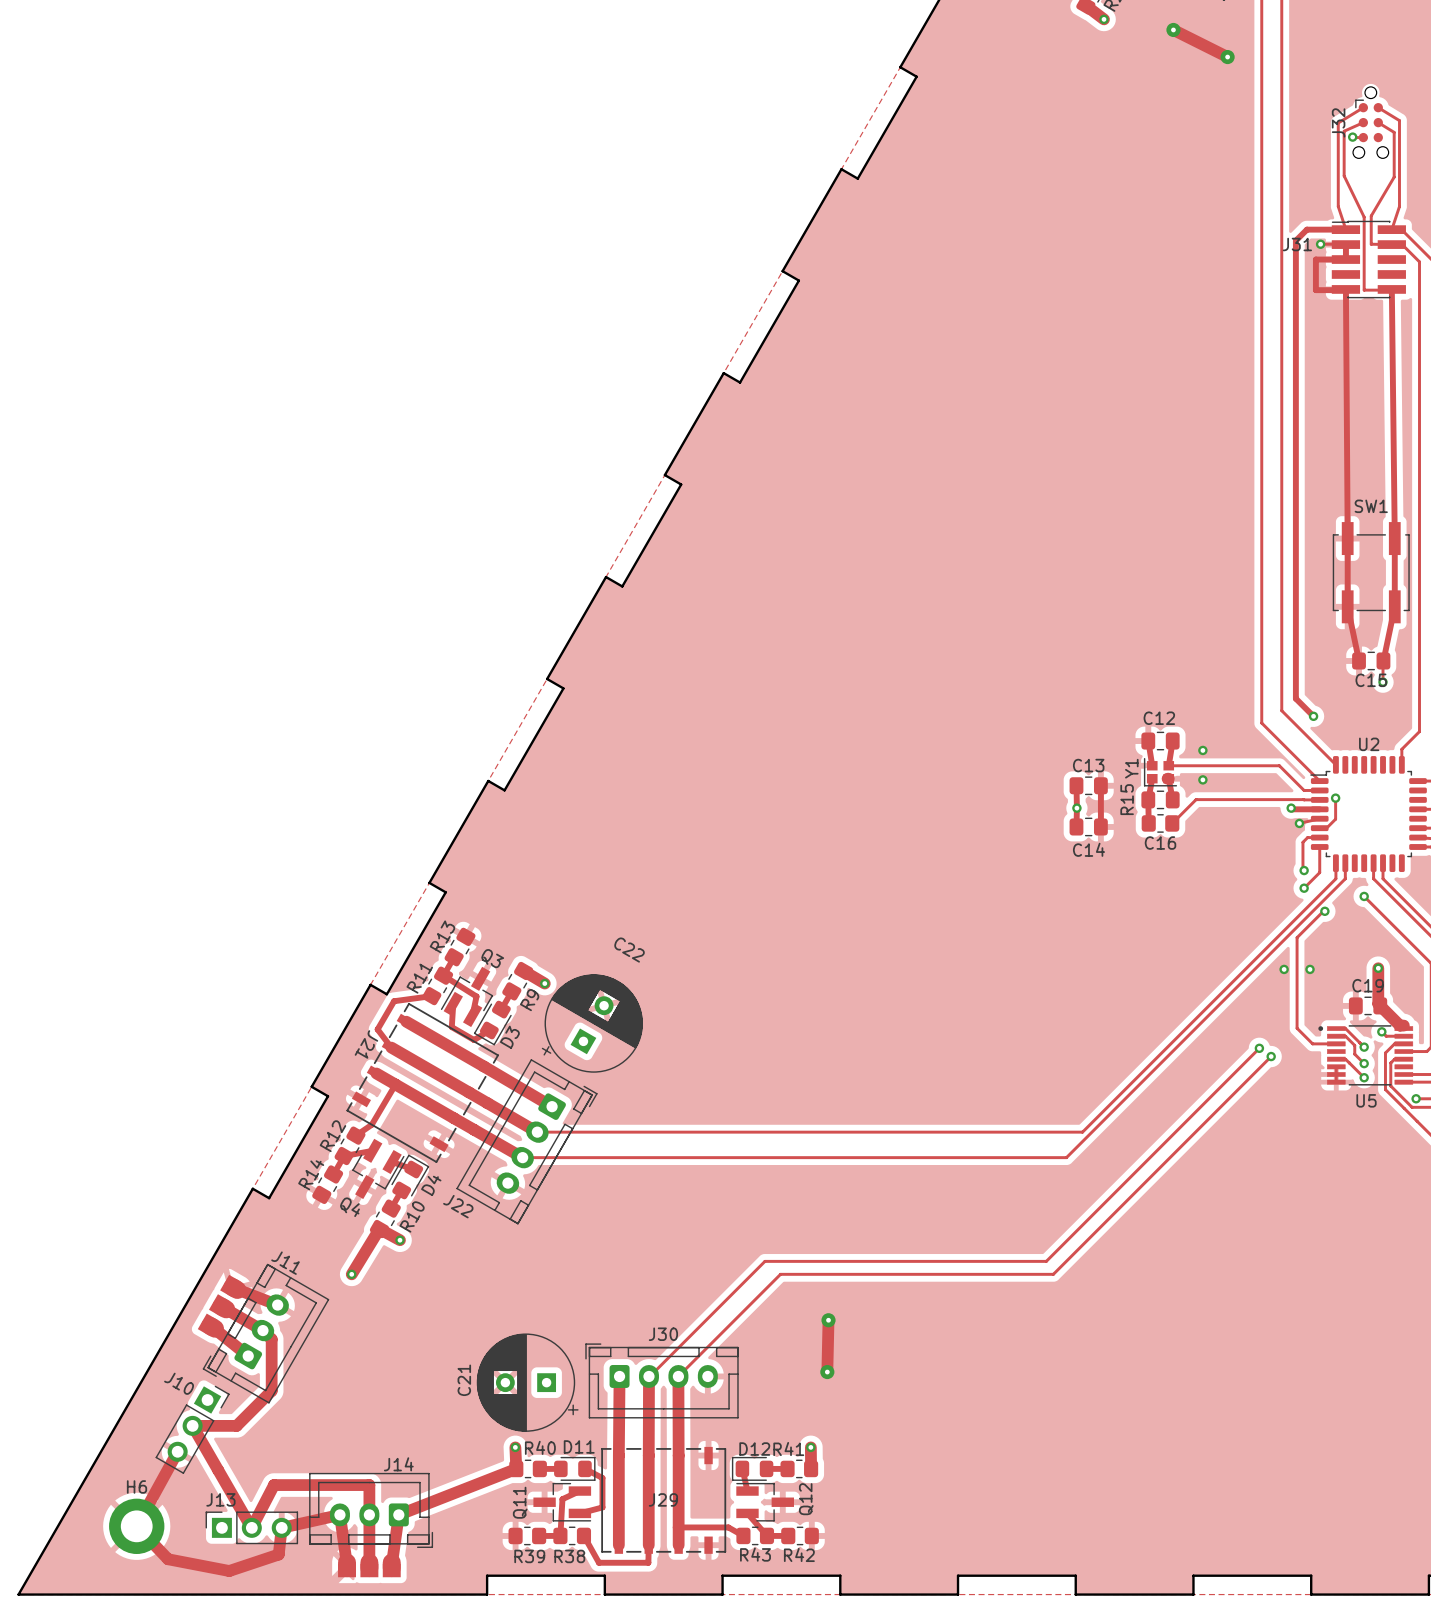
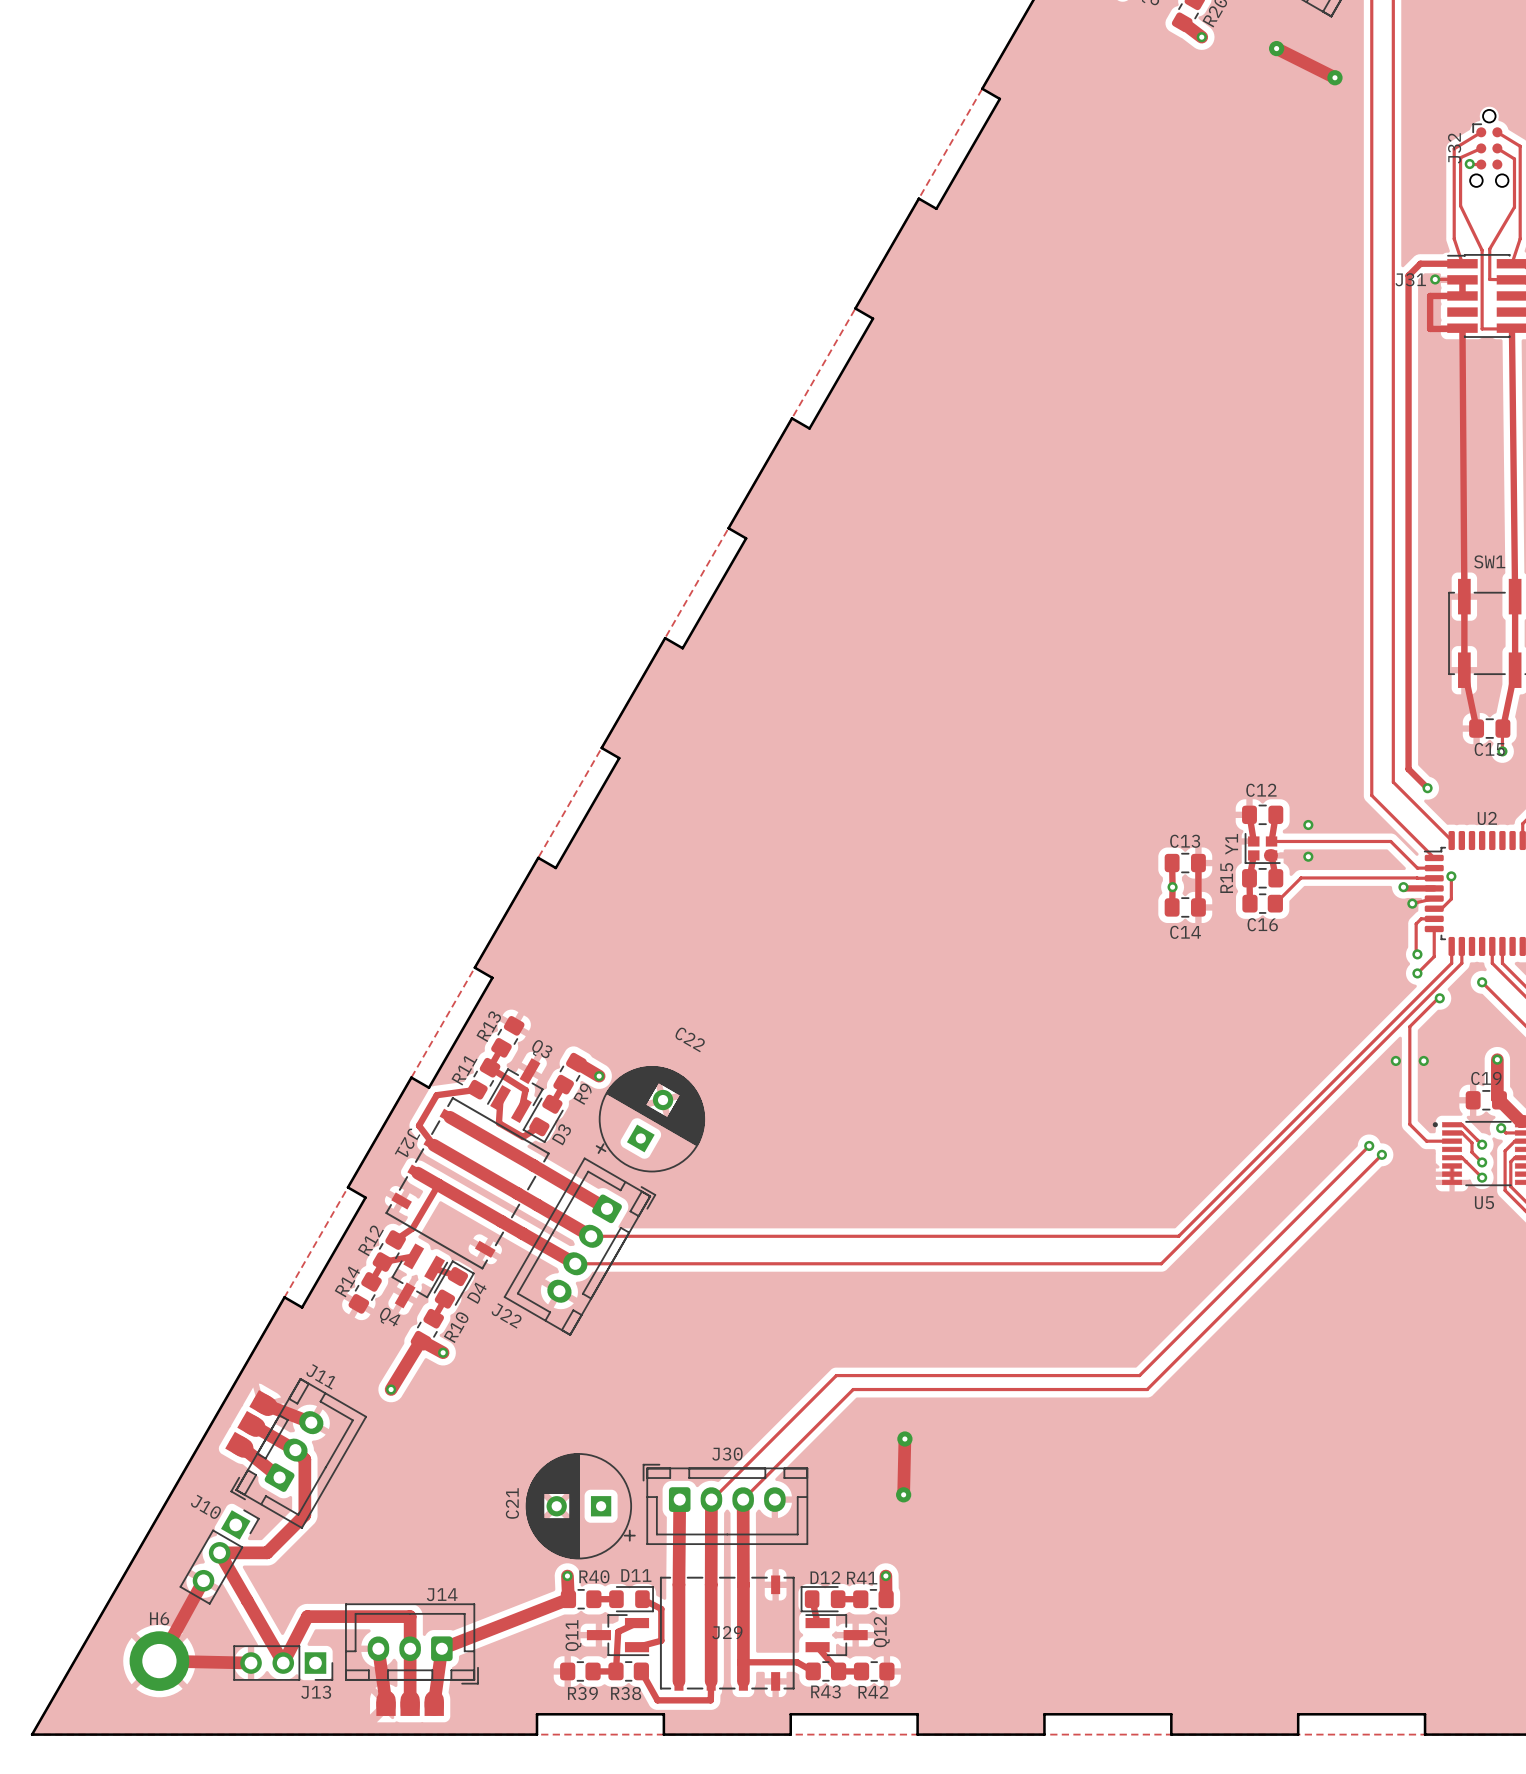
track: (339, 1514) (281, 1527) (278, 1554) (229, 1571) (168, 1559) (136, 1526) -> (251, 1663) (159, 1661)
J13 rotation: 0° (251, 1527) -> 180° (283, 1663)

